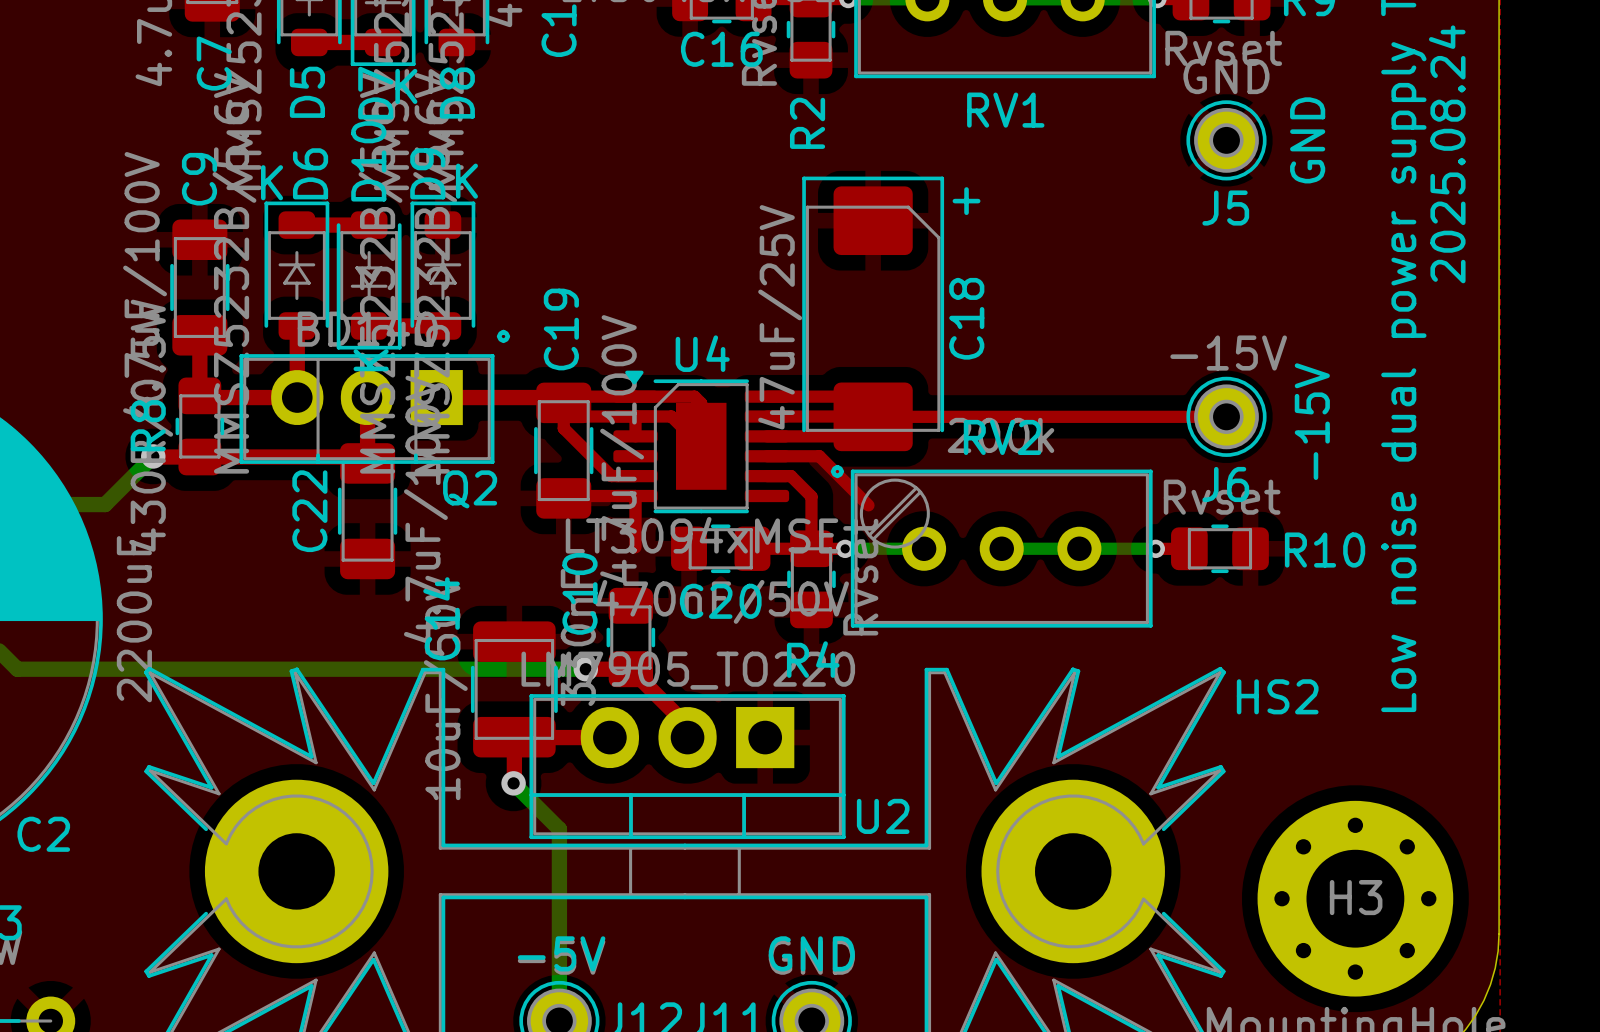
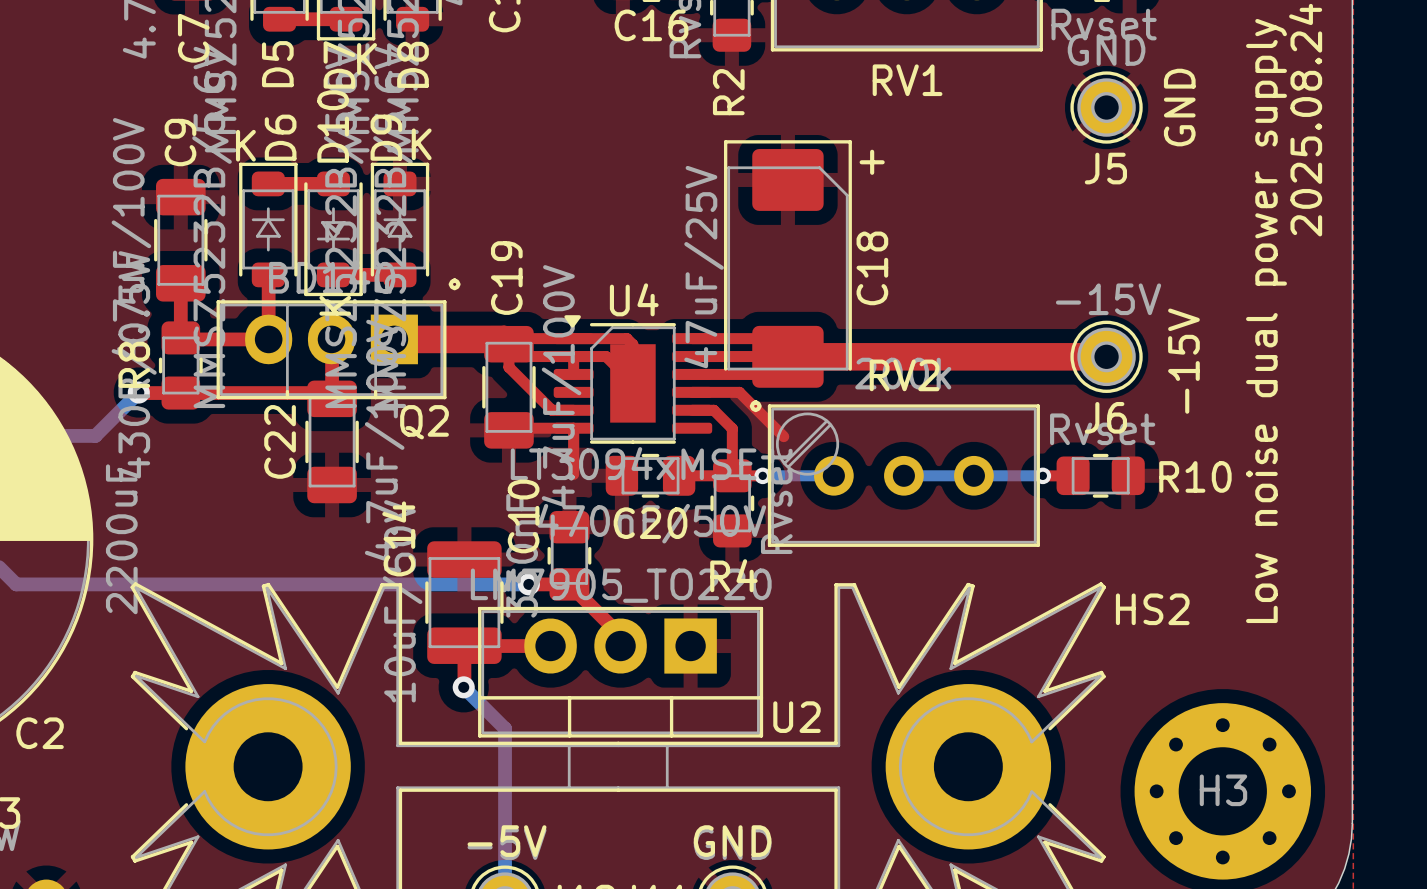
top track width: thin (436, 397) (558, 397) (563, 402) -> thick (394, 339) (504, 339) (508, 344)
top track width: thin (873, 416) (1226, 416) -> thick (787, 356) (1106, 356)

